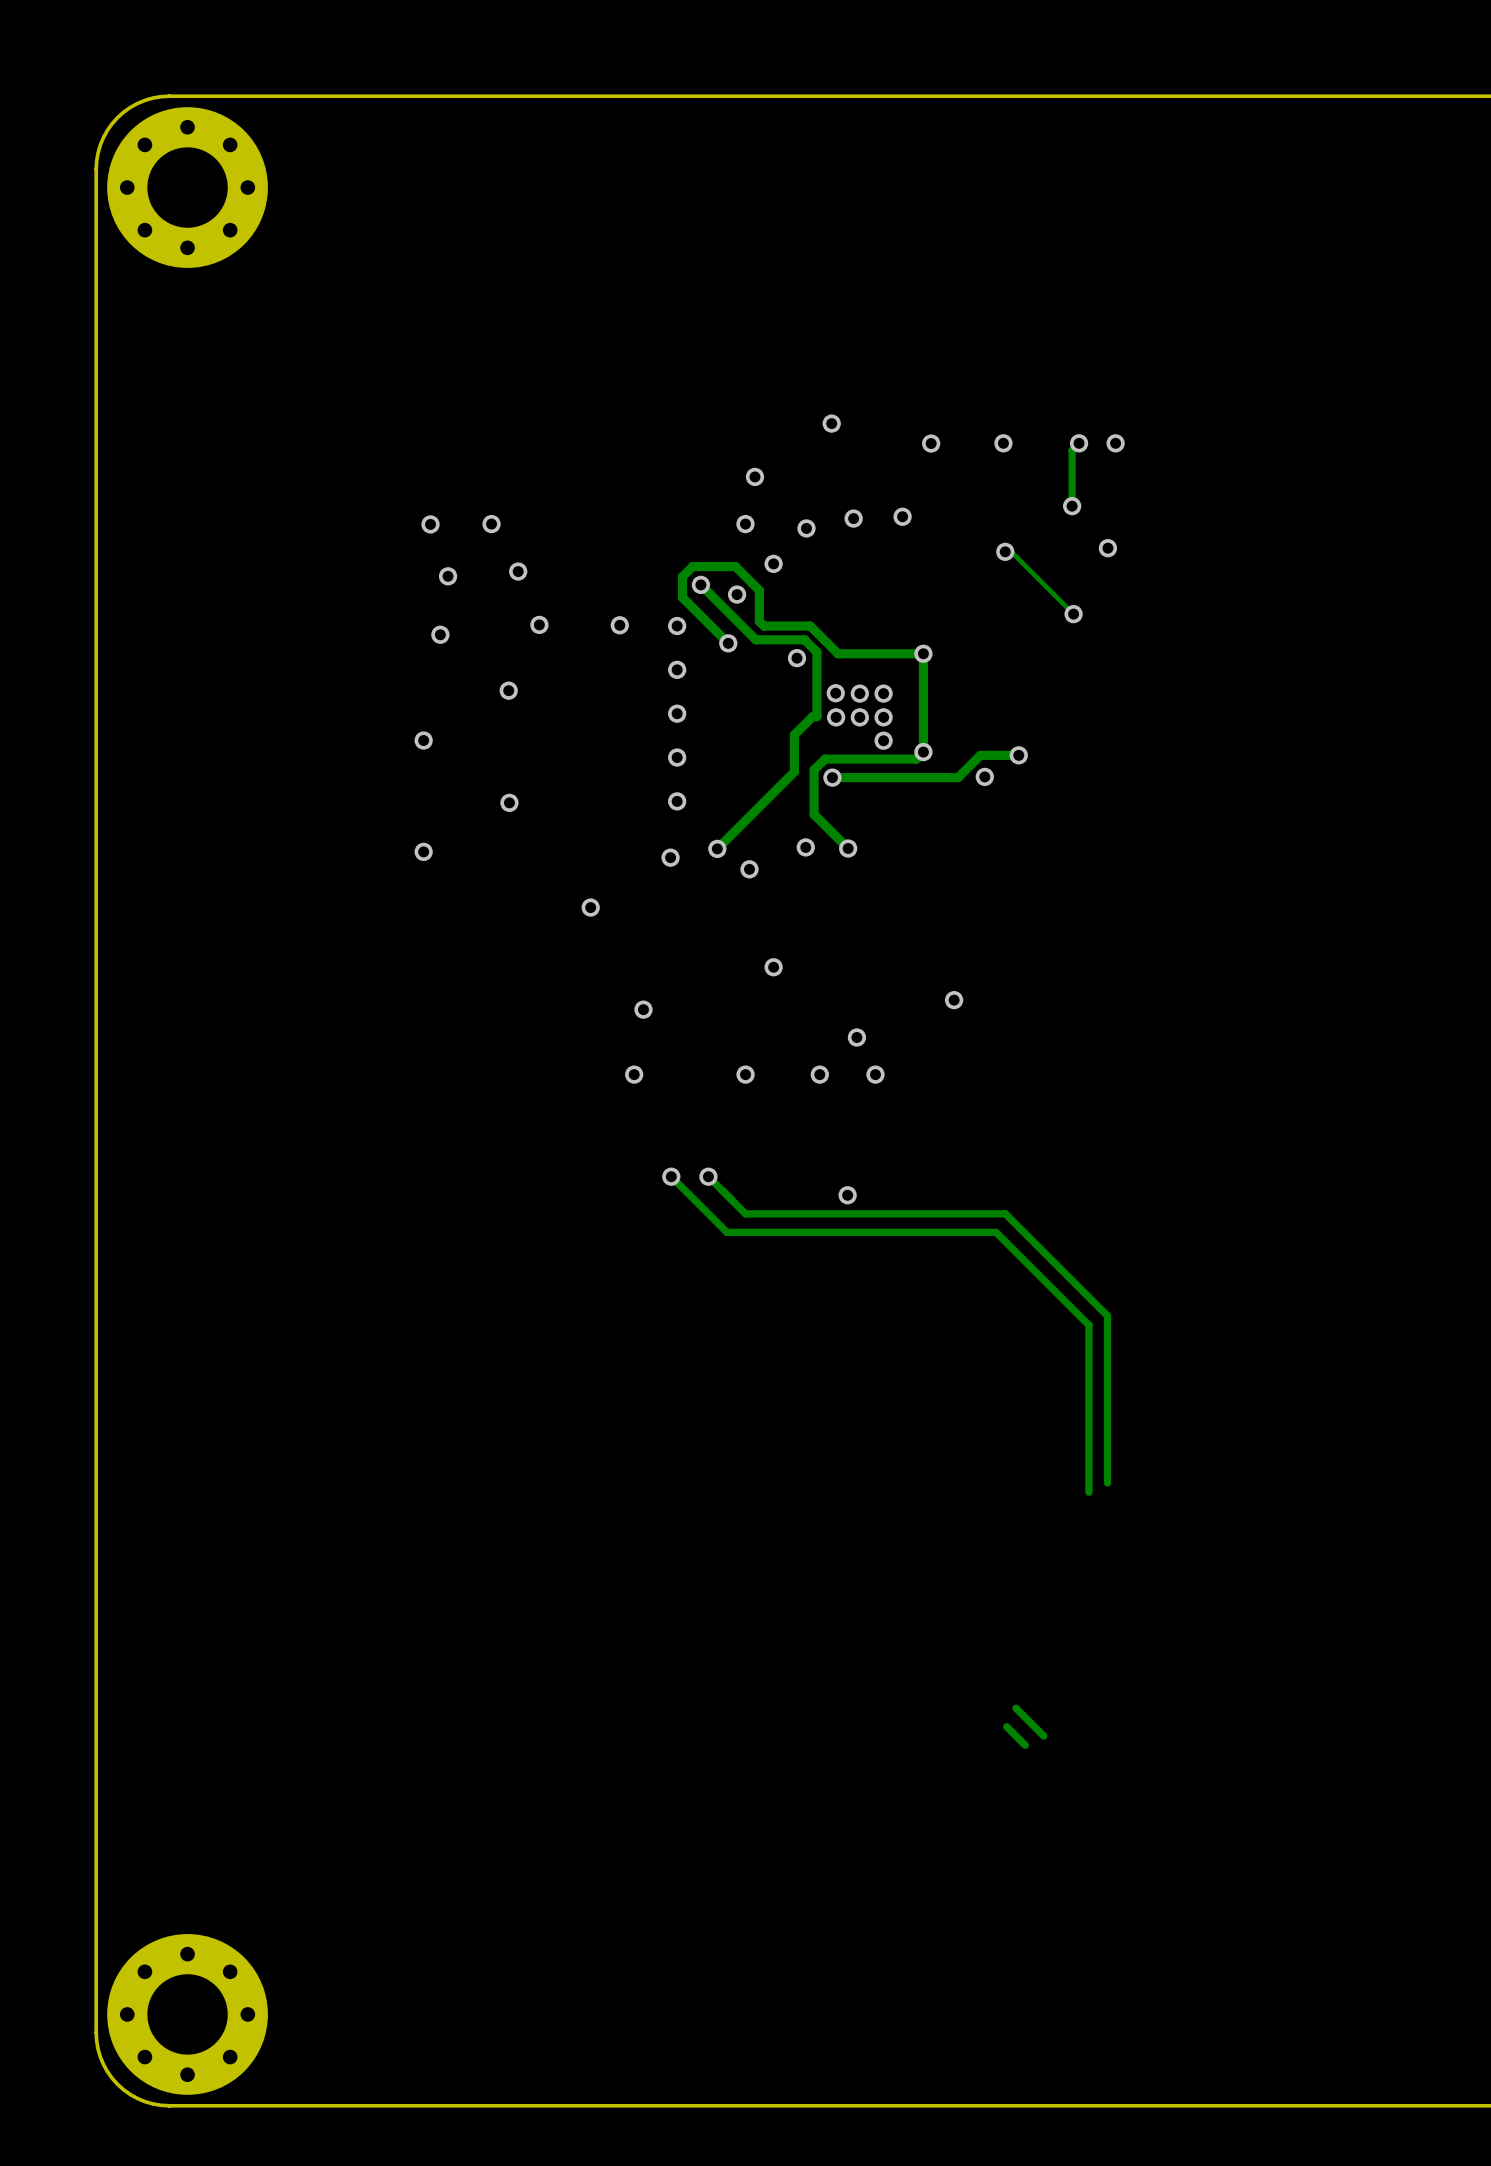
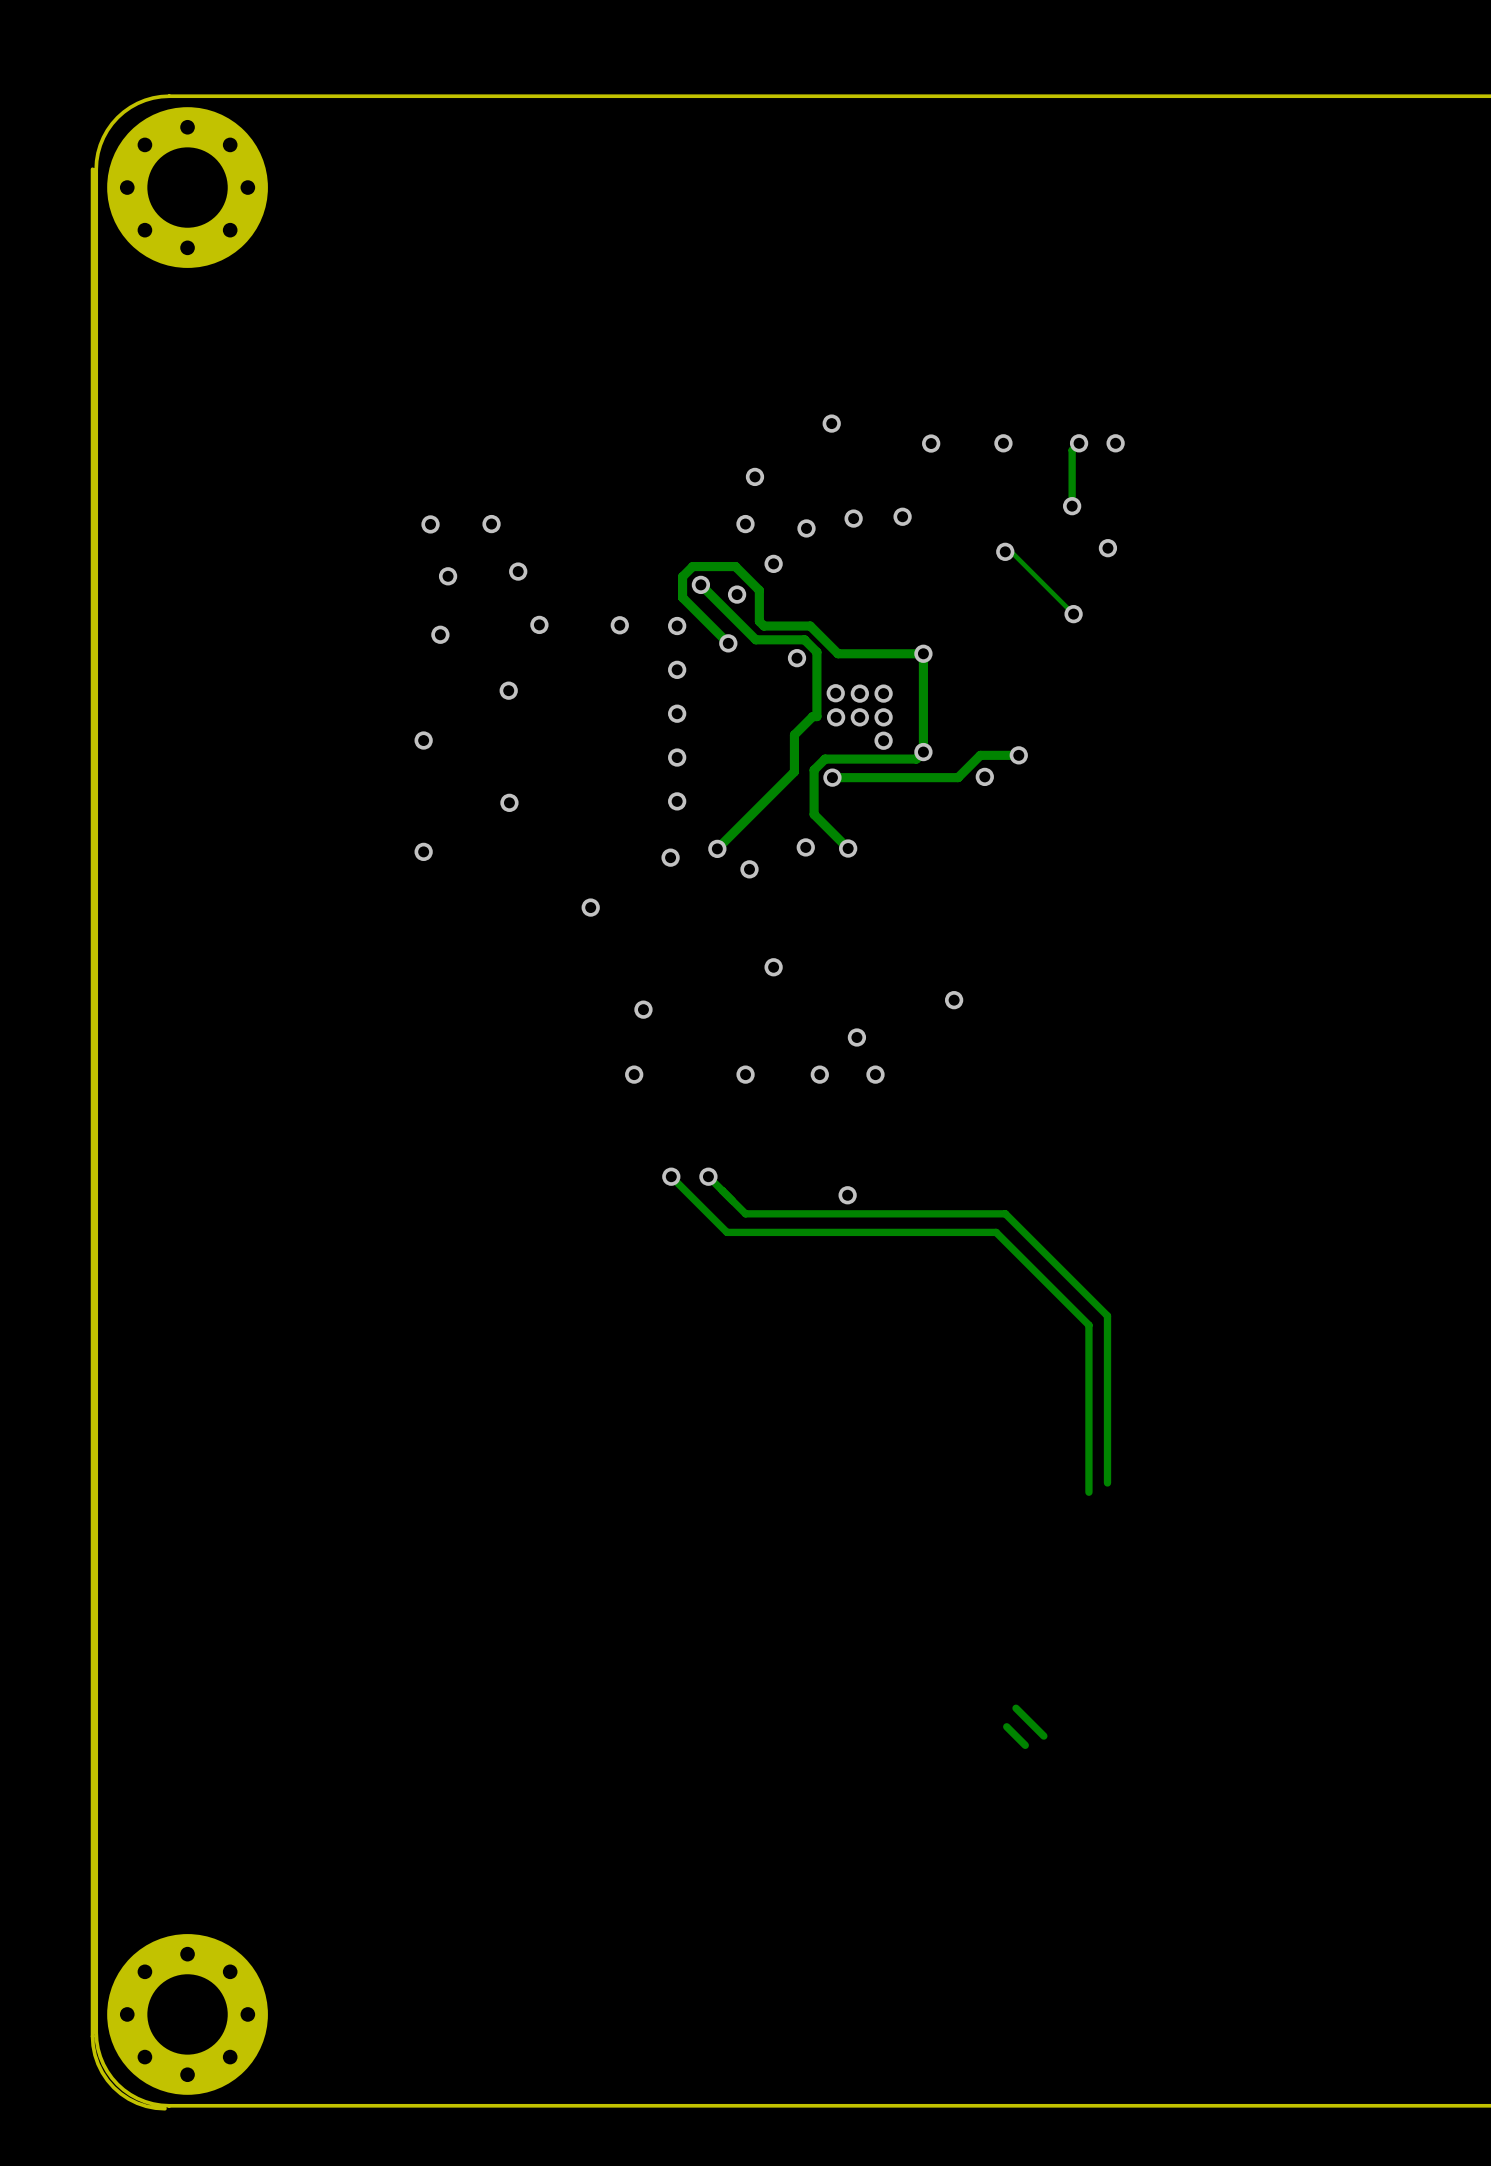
board edge: none -> (92, 169) (92, 2036) (98, 2064) (113, 2087) (137, 2103) (164, 2108)

